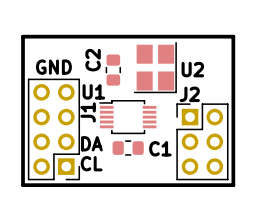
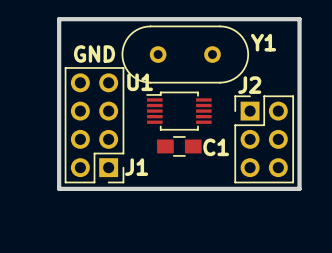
Y1: none -> (185, 54)
U2: (155, 67) -> none
C2: (113, 70) -> none
J1 name rotation: 0° (88, 112) -> 90° clockwise (136, 167)
J1 name position: J1 (88, 112) -> J1 (136, 167)
C1 footprint: [112, 140, 144, 156] -> [157, 136, 202, 157]
text: DA (91, 143) -> none
text: CL (91, 163) -> none

